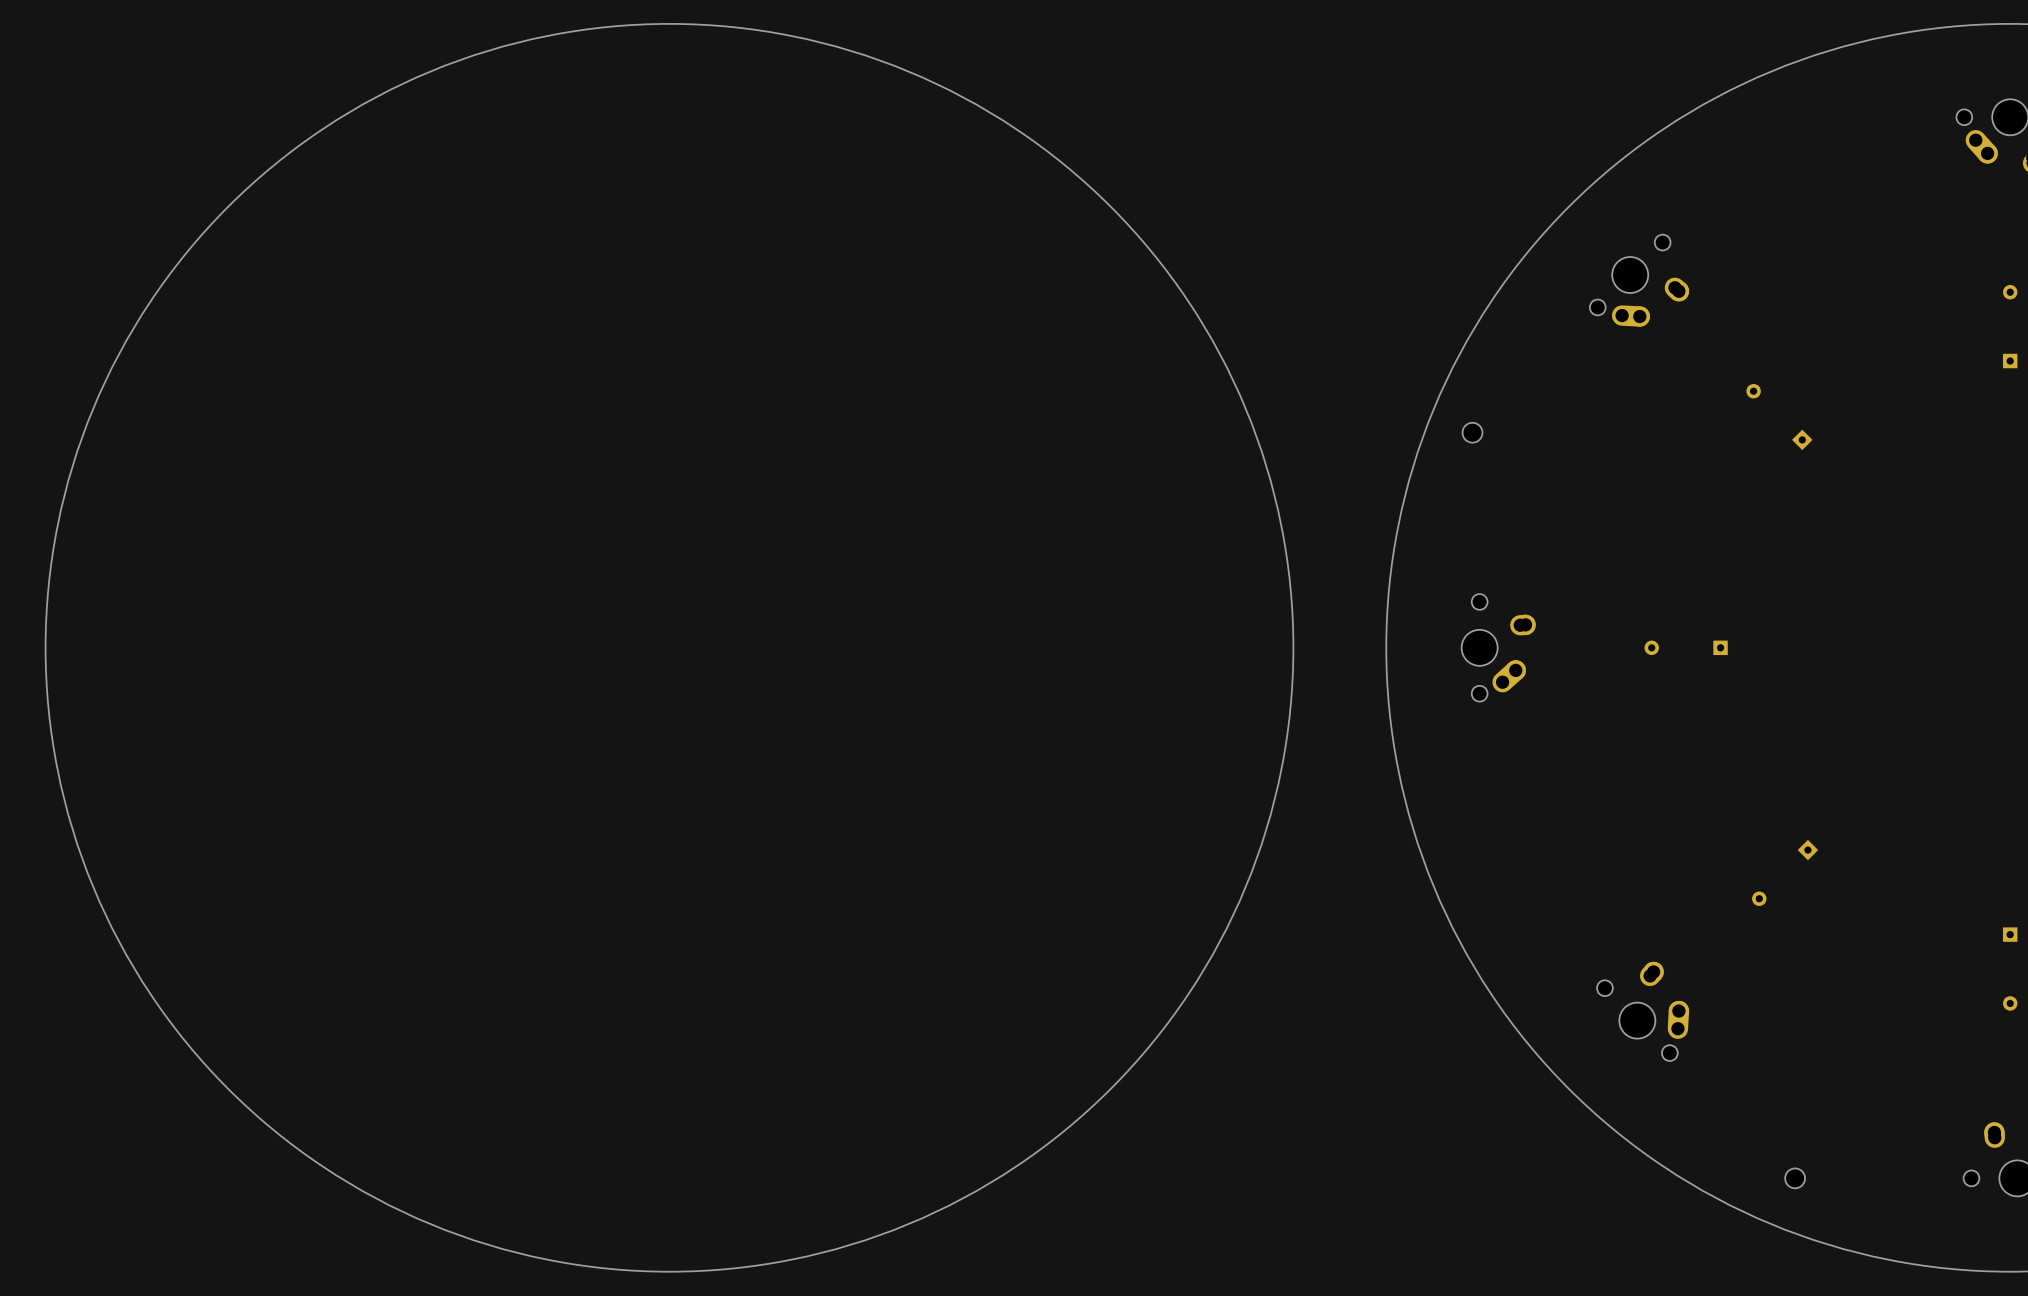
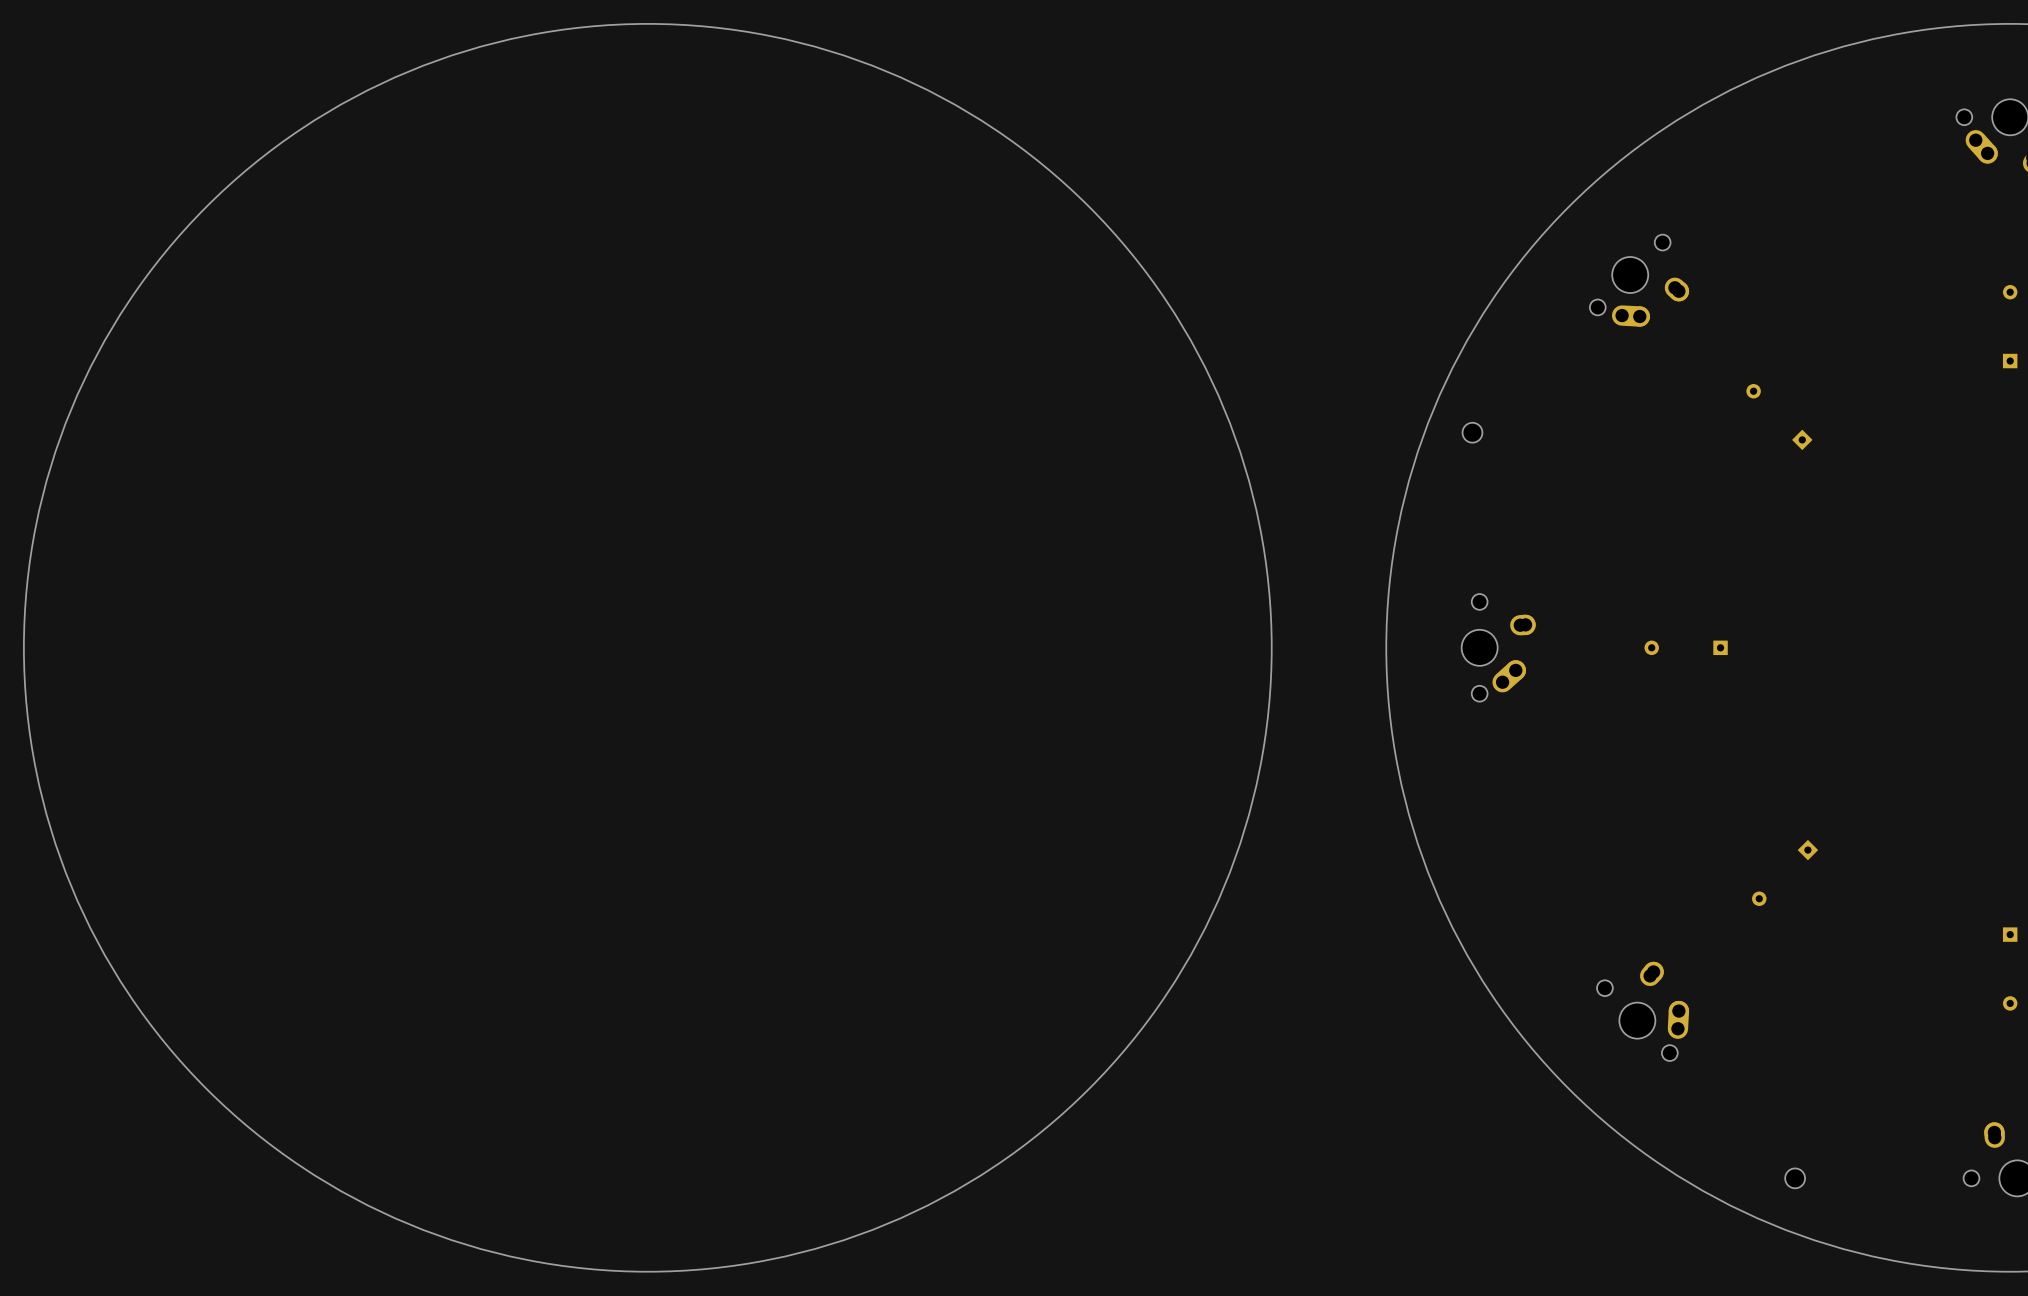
round board edge position: (669, 647) -> (647, 647)

